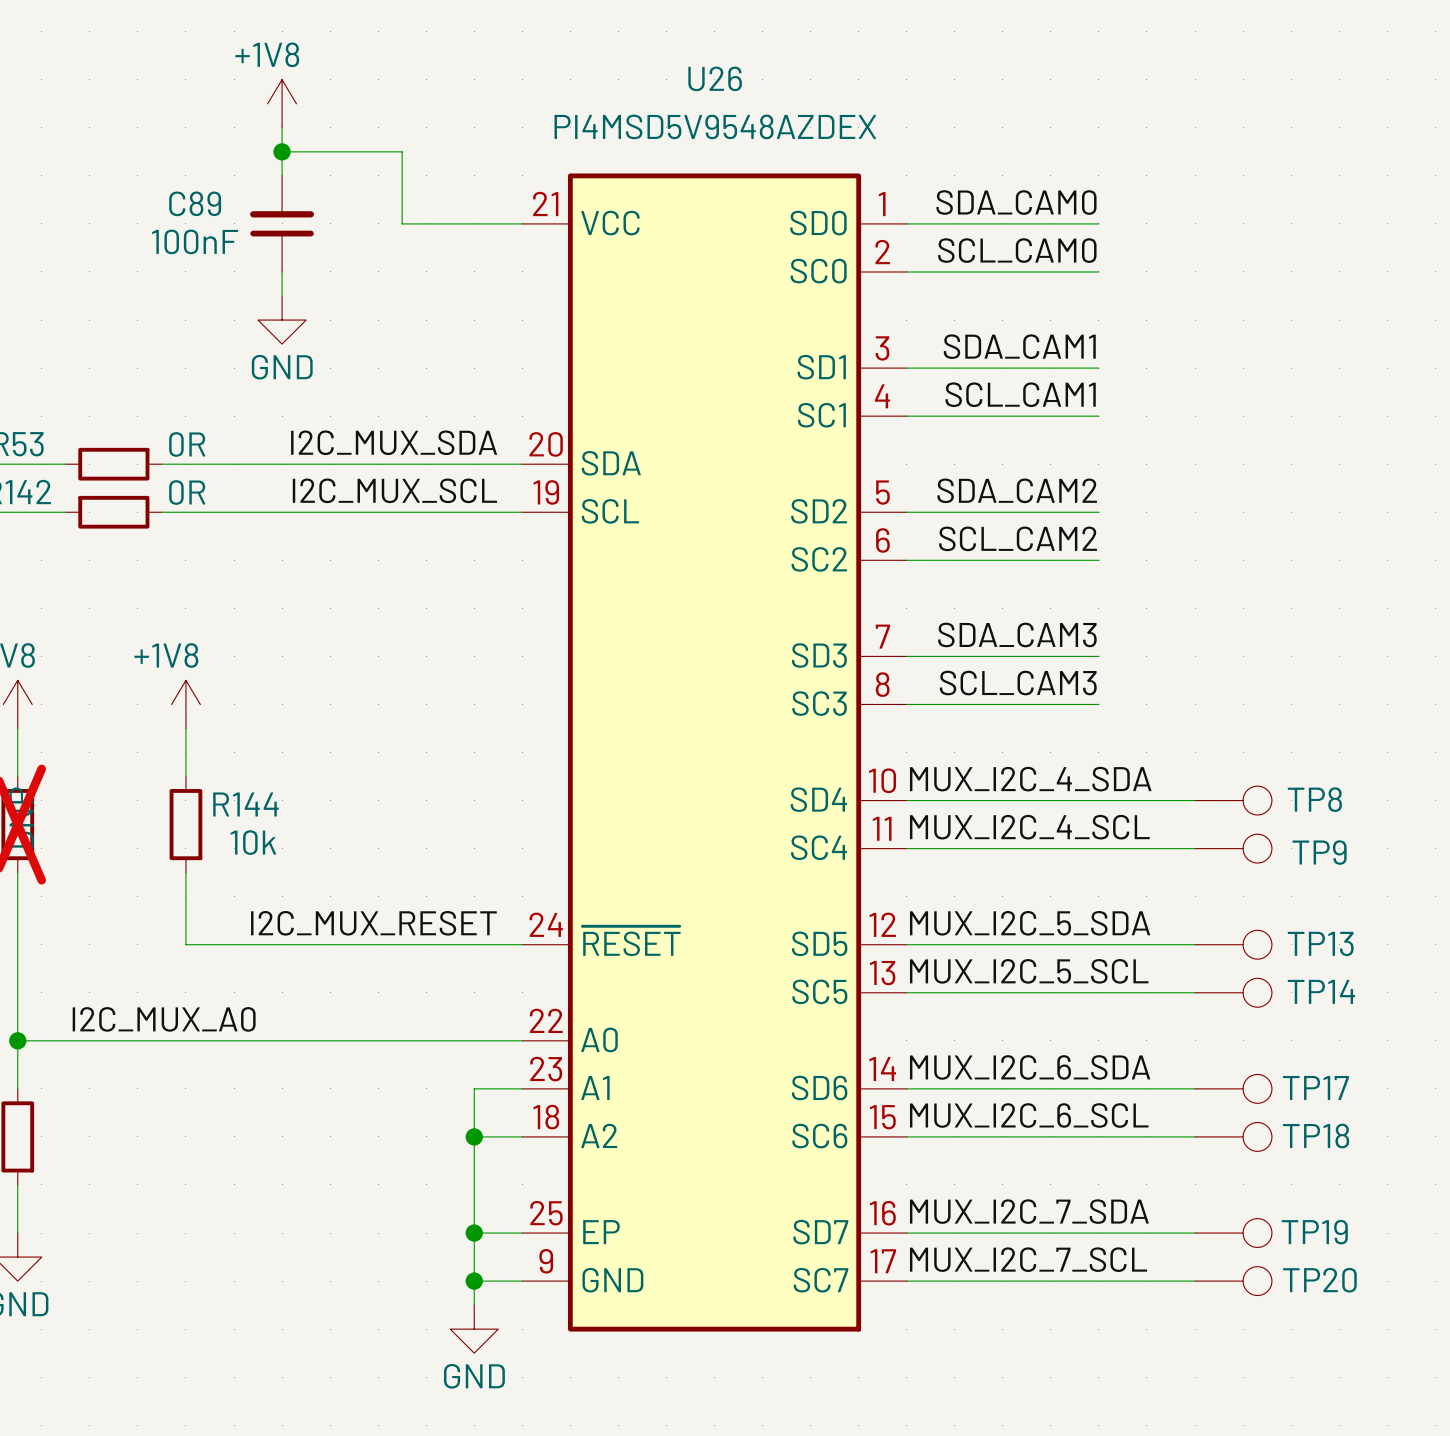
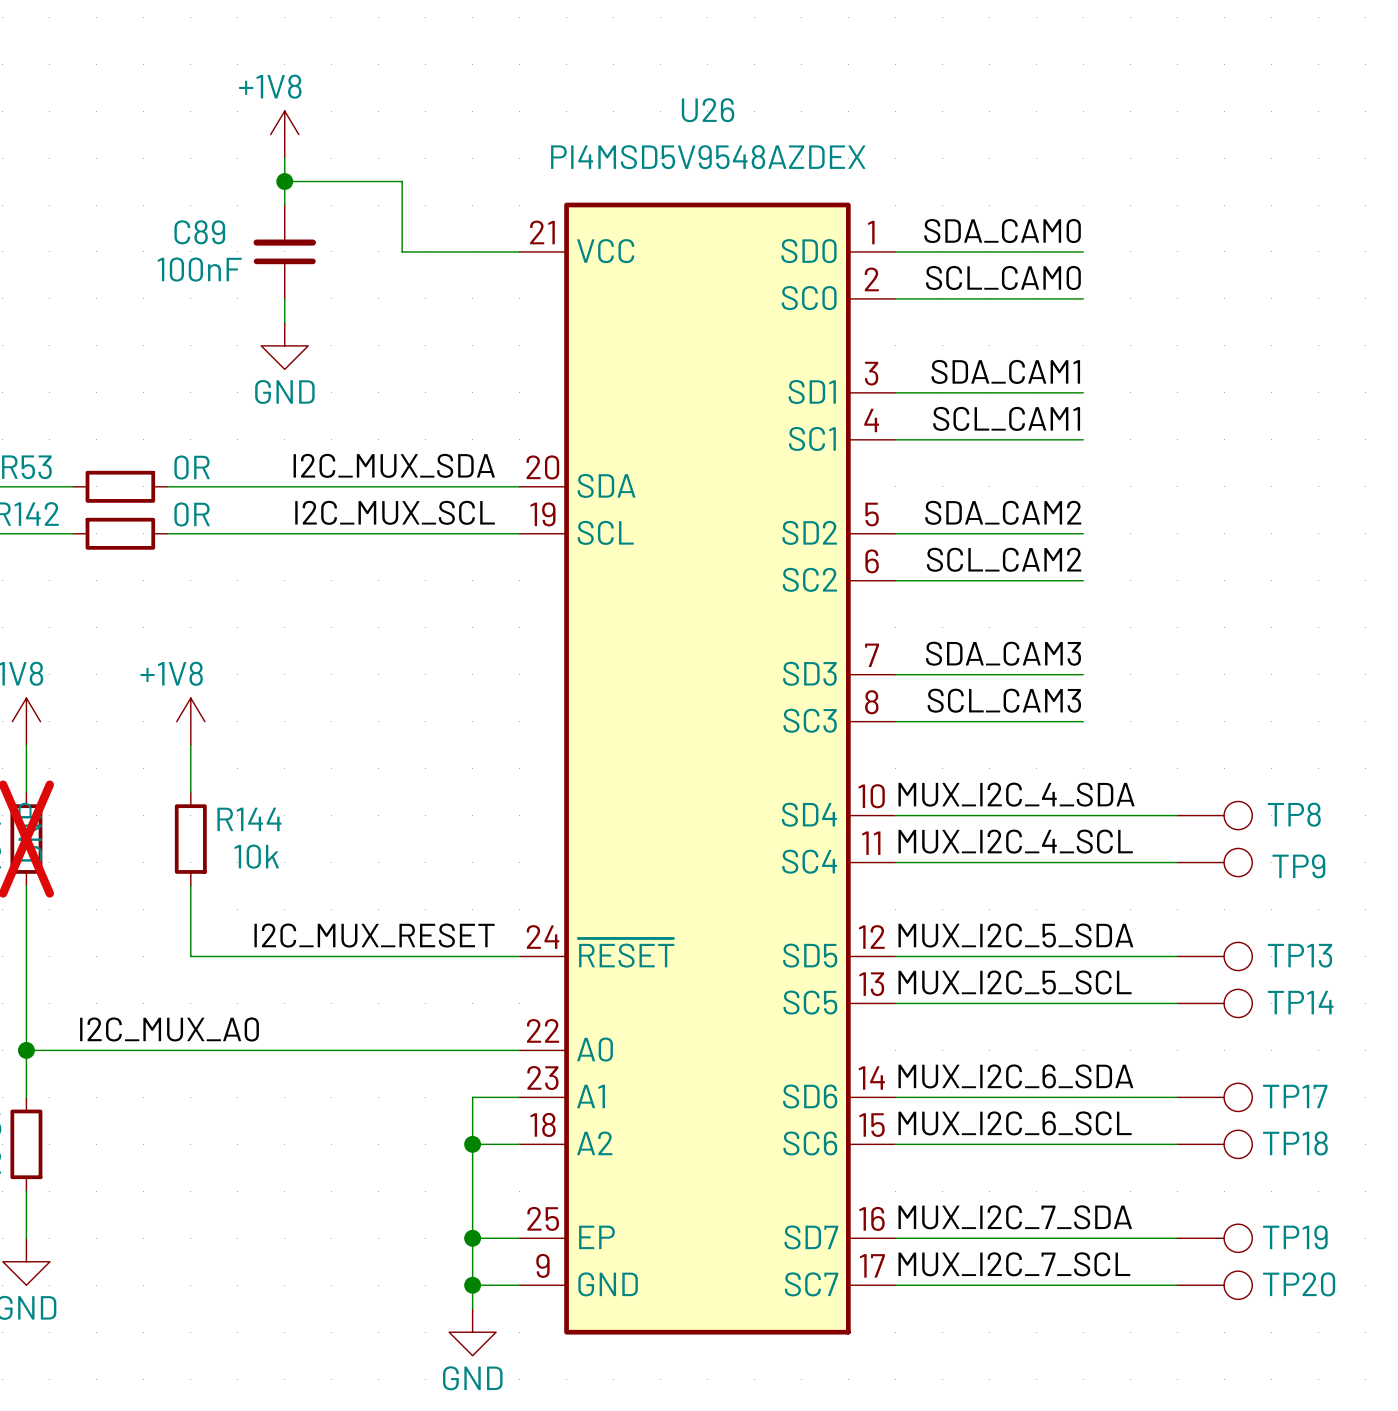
TP19 name position: TP19 (1314, 1232) -> TP19 (1295, 1237)

